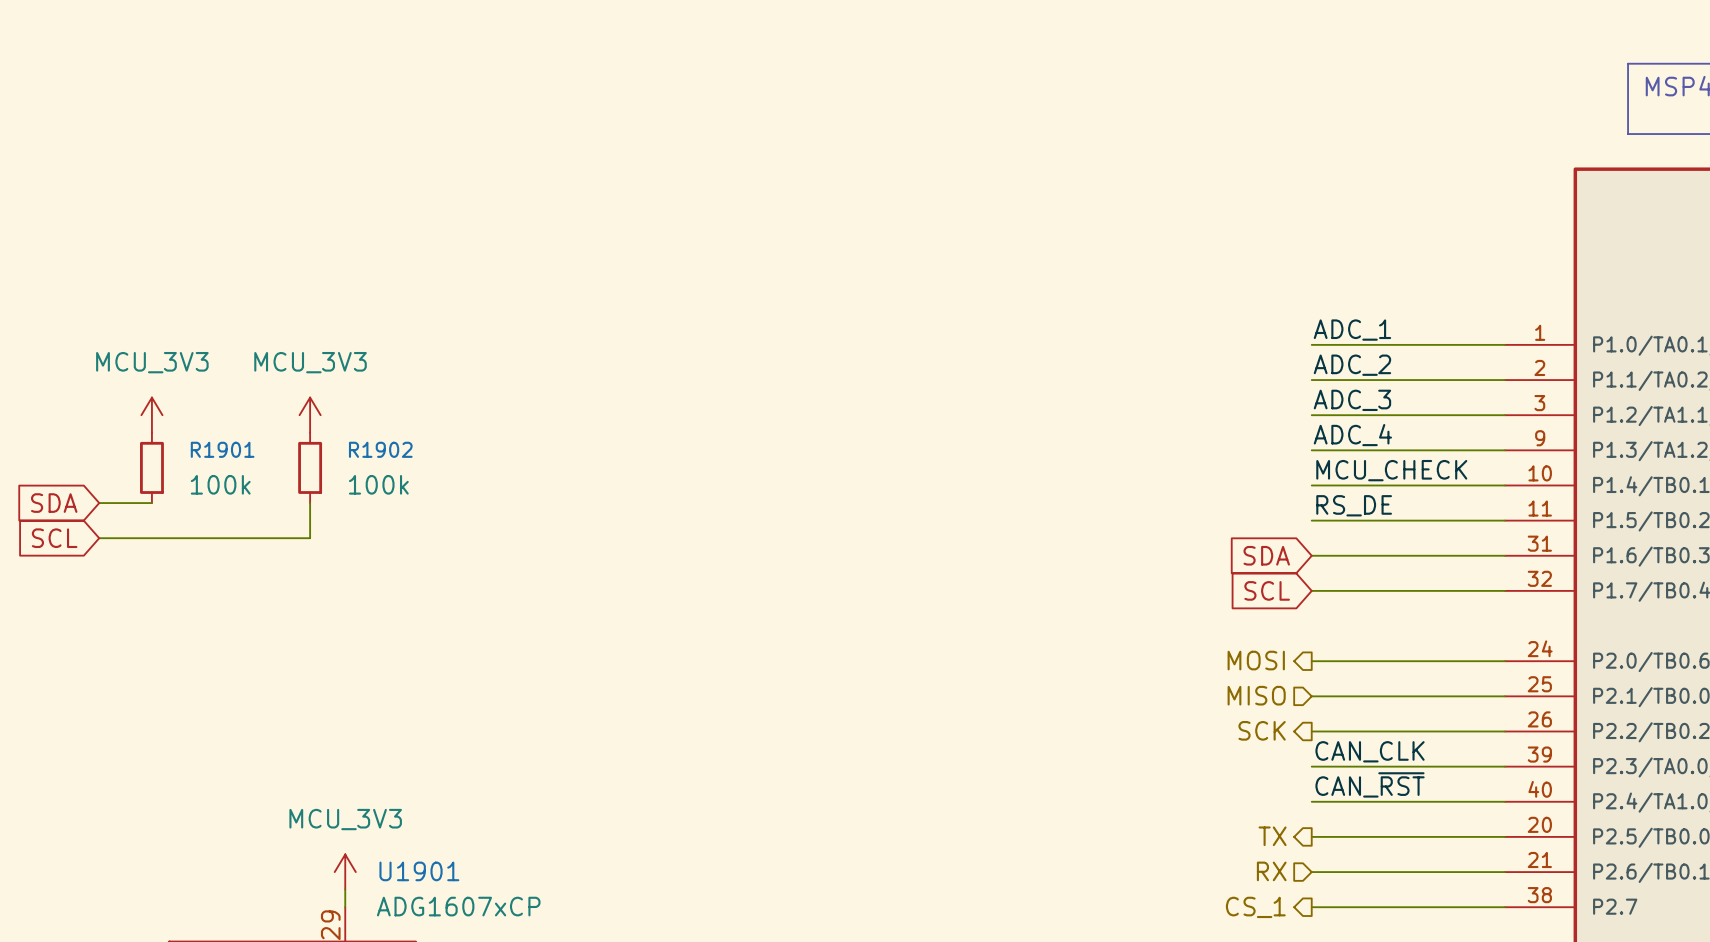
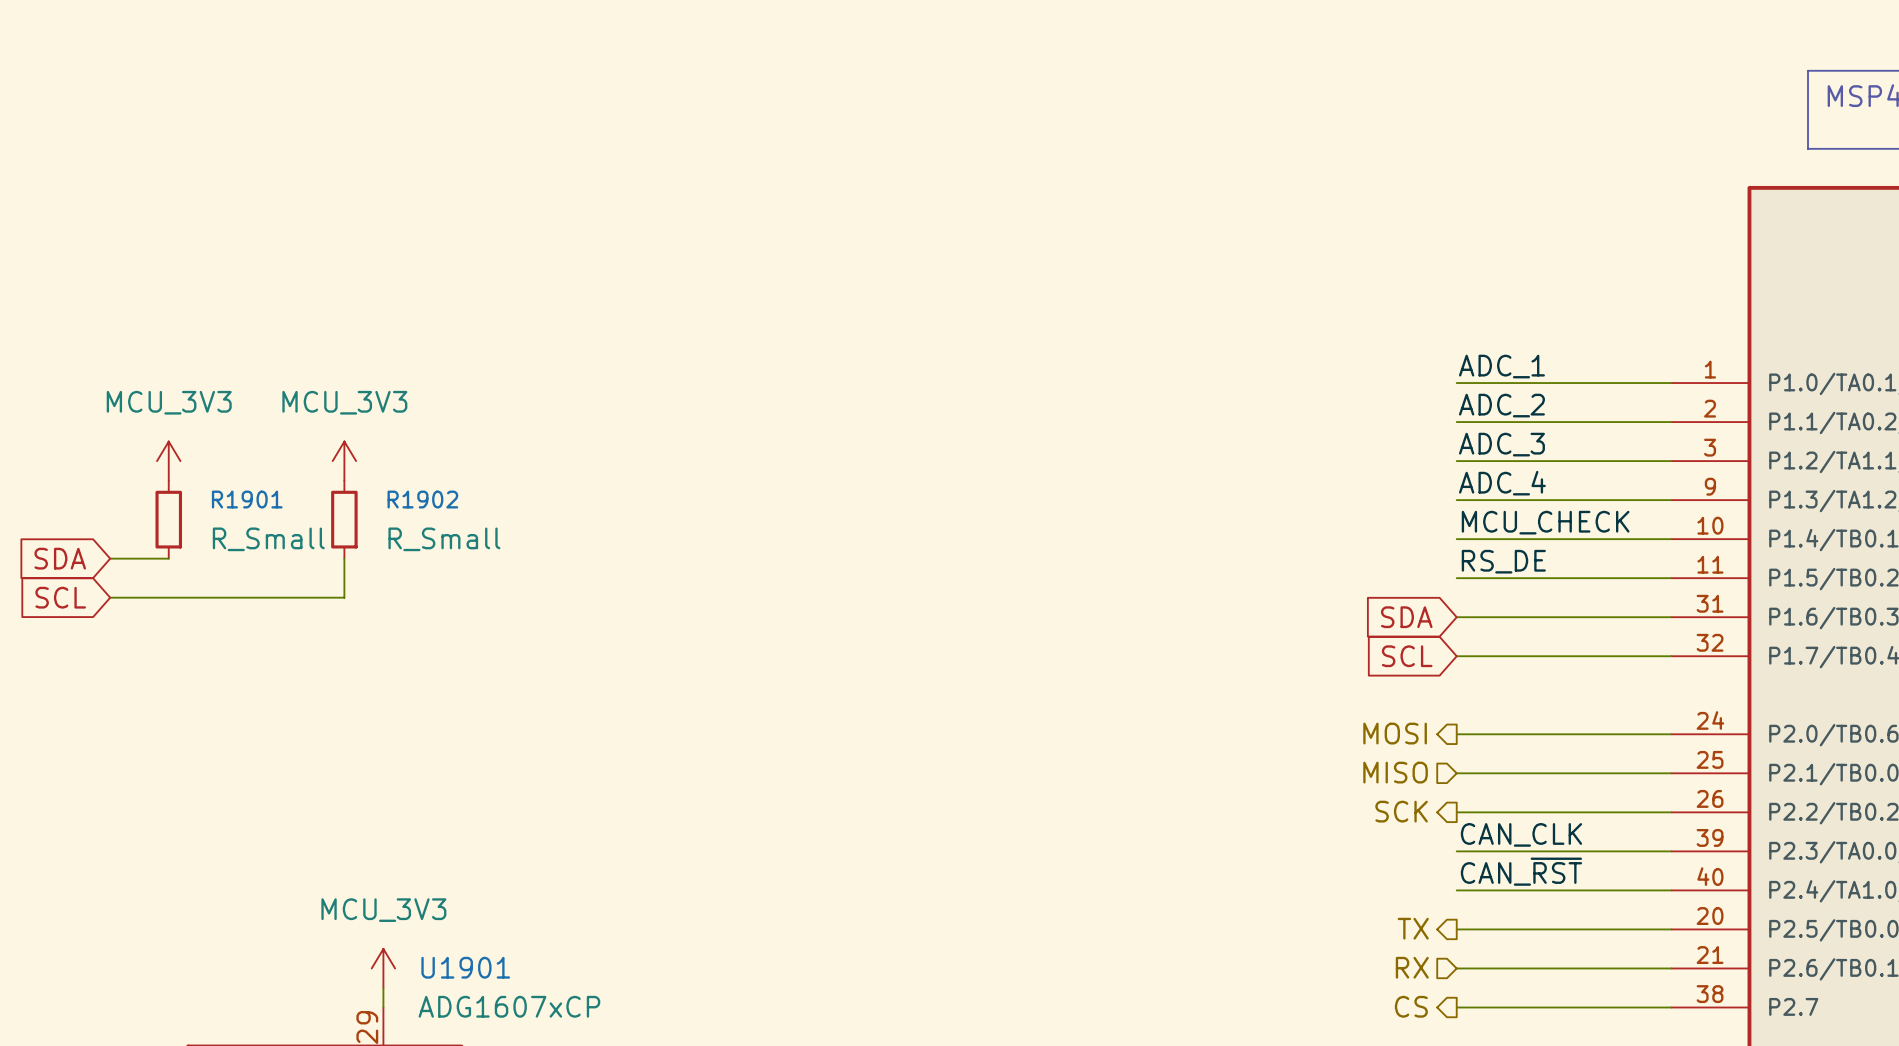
R1901 value: 100k (220, 484) -> R_Small (268, 539)
R1902 value: 100k (378, 484) -> R_Small (444, 539)
hierarchical label: CS_1 (1255, 907) -> CS (1411, 1006)

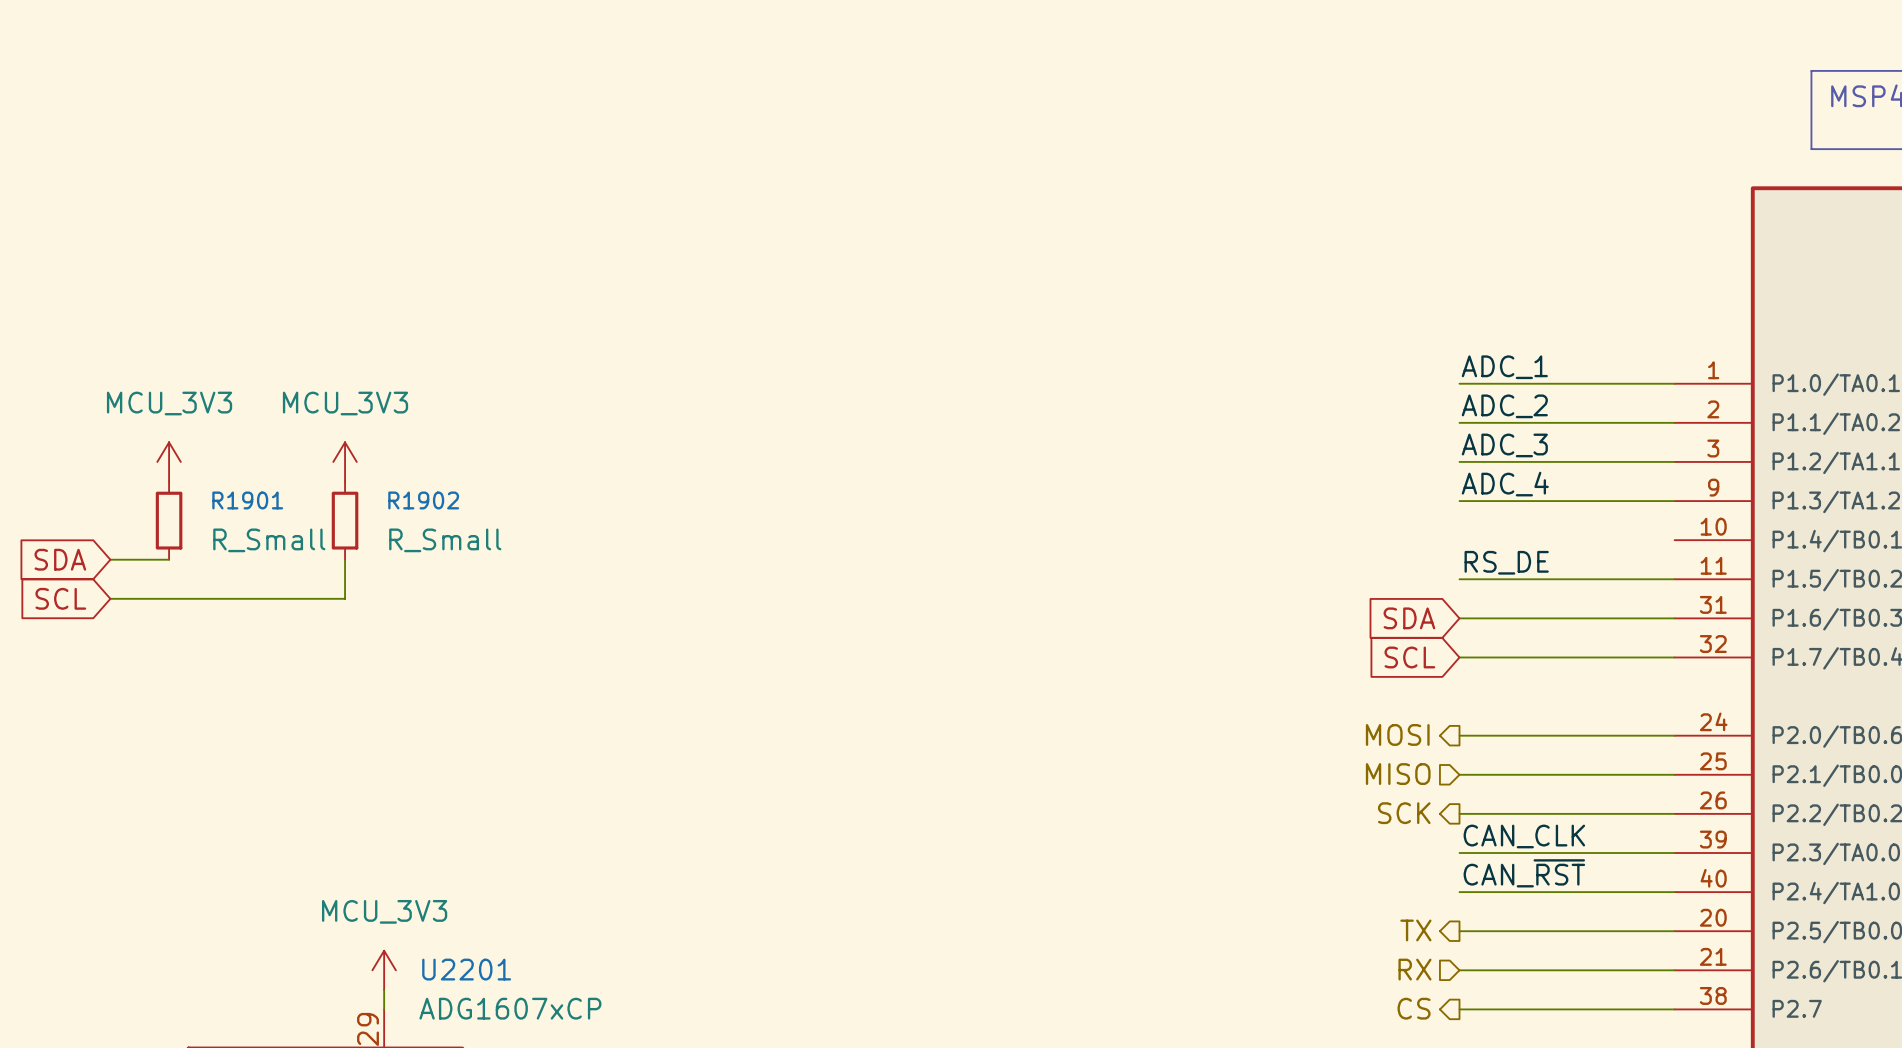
label: MCU_CHECK (1545, 522) -> none
wire: (1456, 539) (1671, 539) -> none
U1901 name: U1901 (465, 967) -> U2201 (466, 969)

